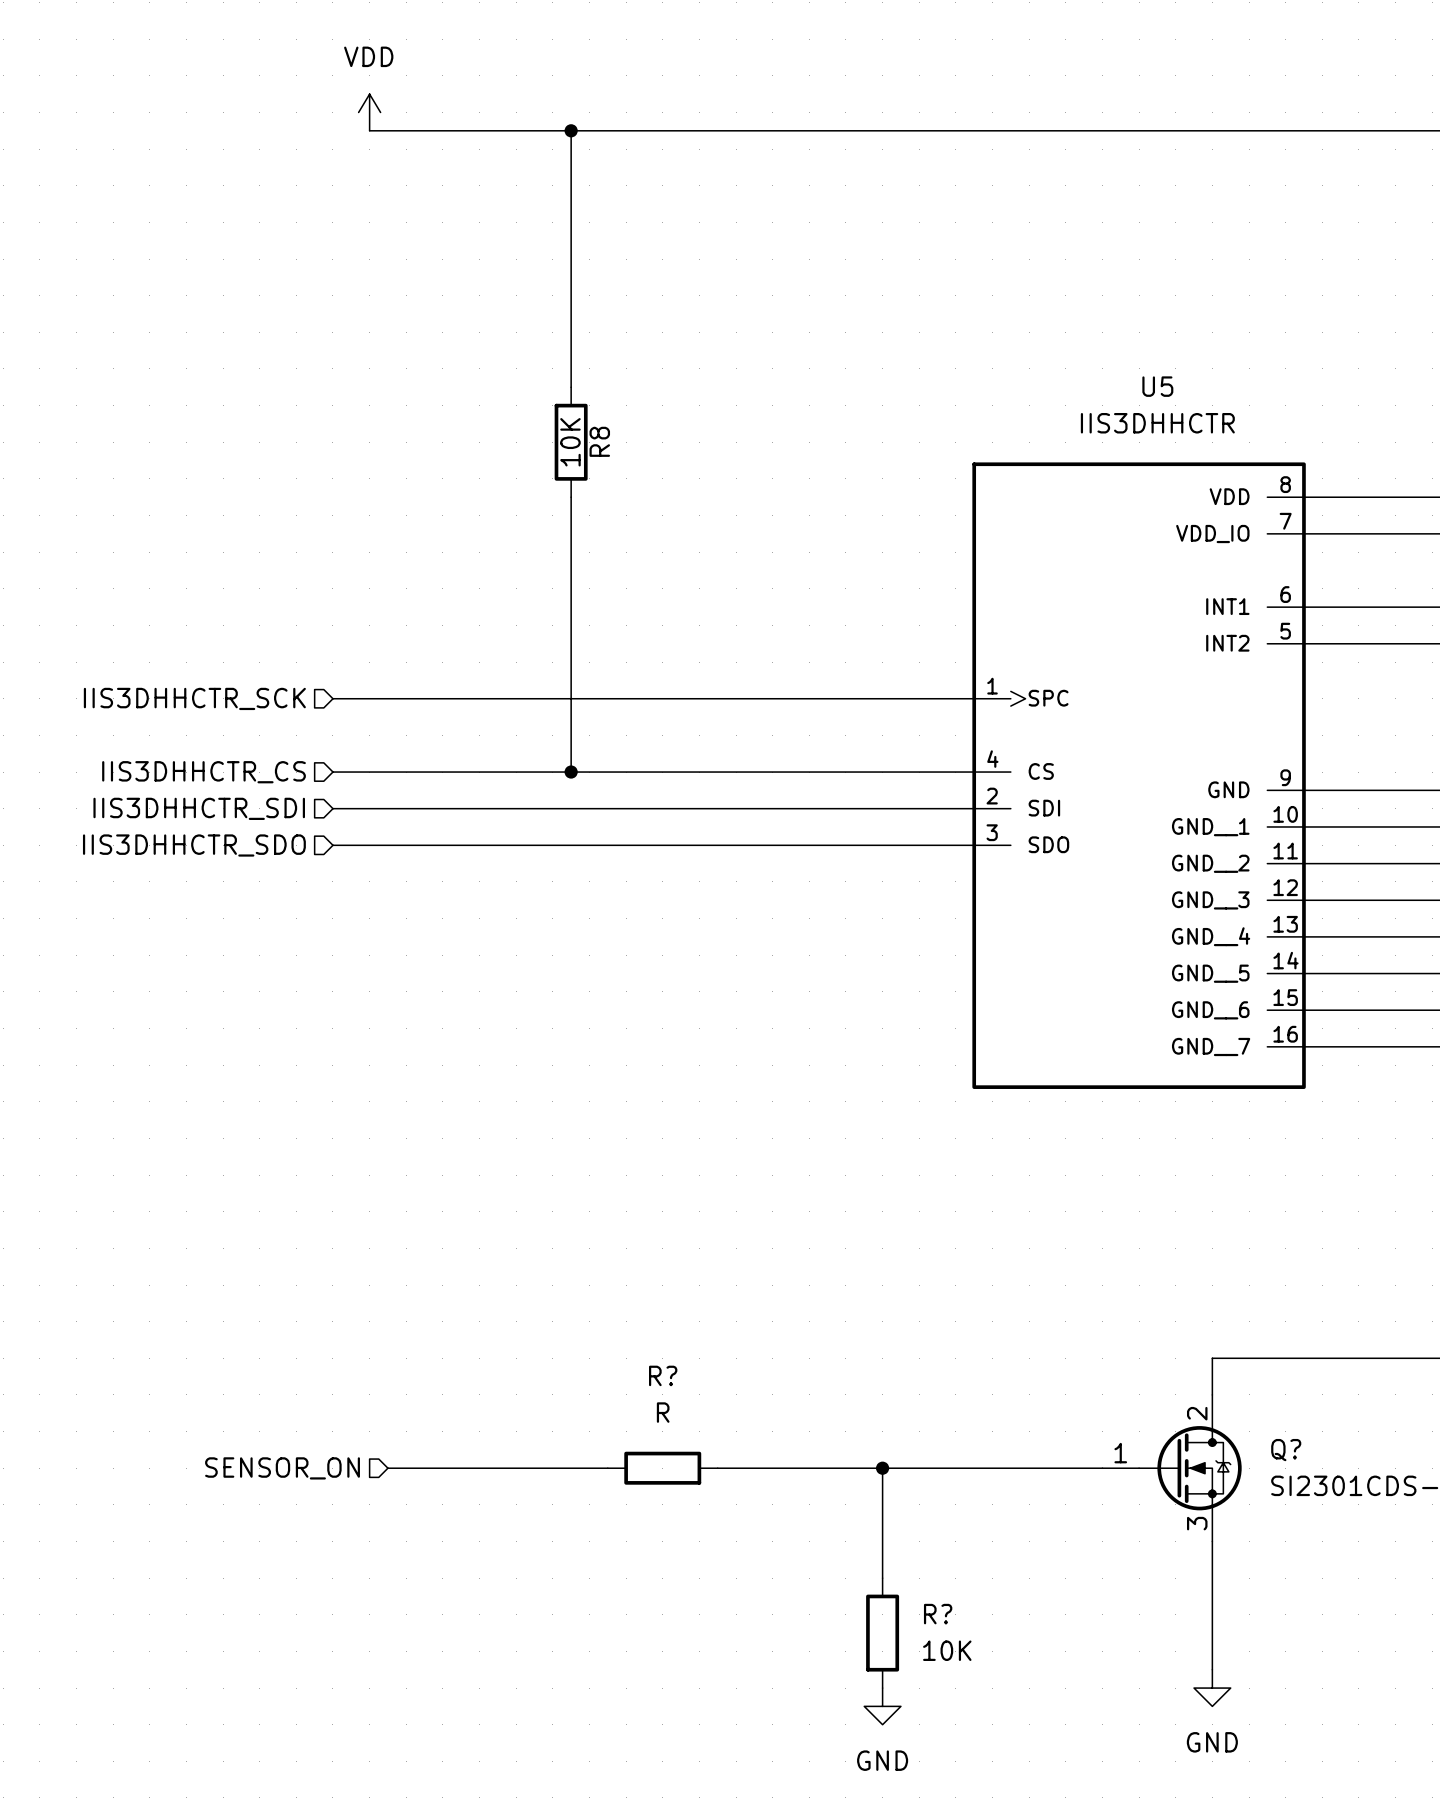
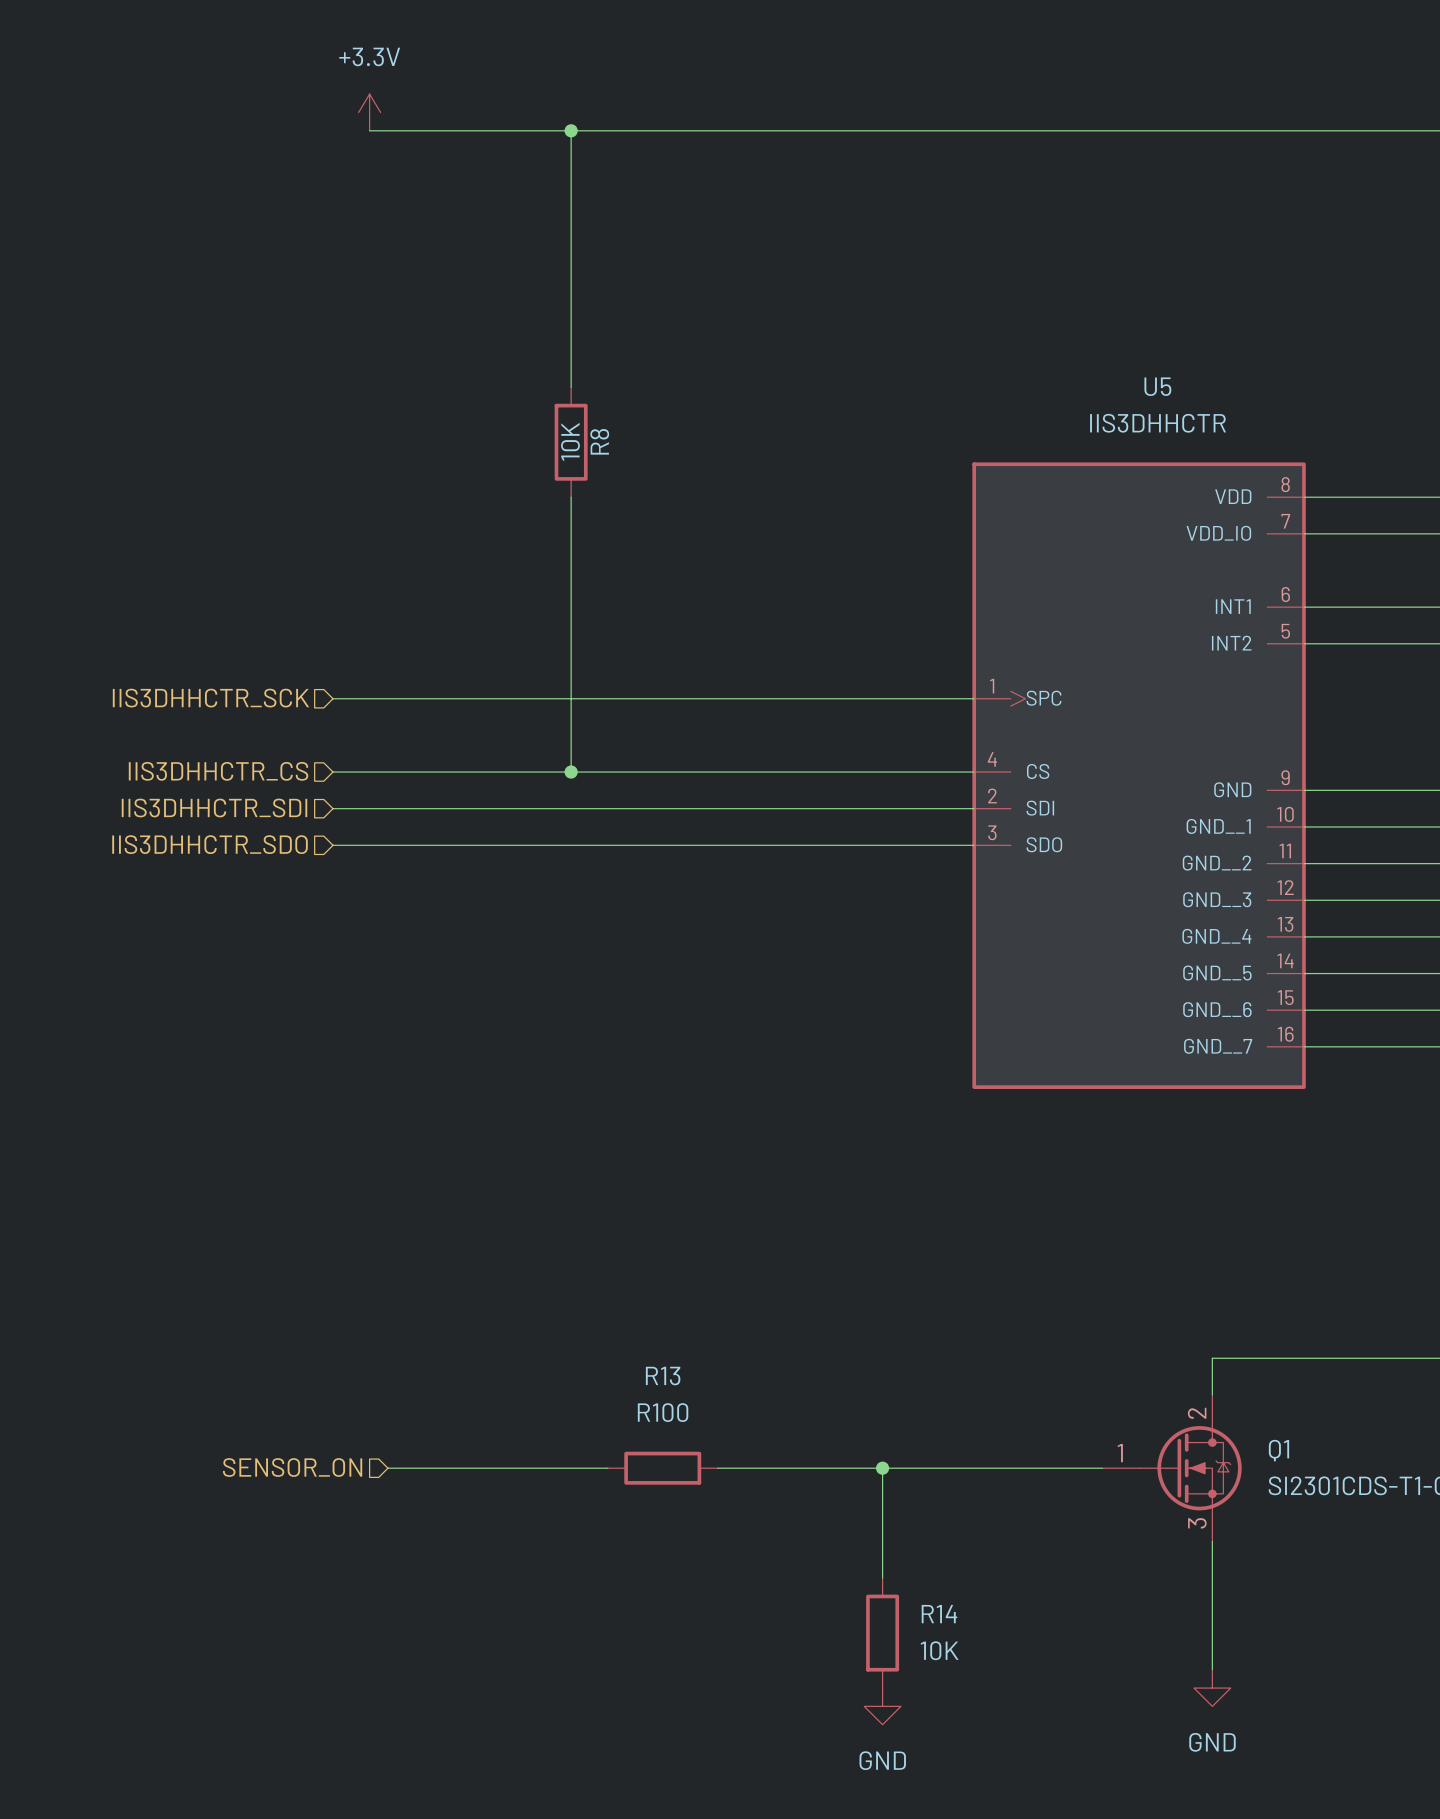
power symbol: VDD (369, 112) -> +3.3V (369, 112)
R? name: R? (663, 1375) -> R13 (663, 1376)
R? value: R (663, 1412) -> R100 (663, 1412)
Q? name: Q? (1286, 1450) -> Q1 (1278, 1450)
R? name: R? (938, 1614) -> R14 (939, 1614)

